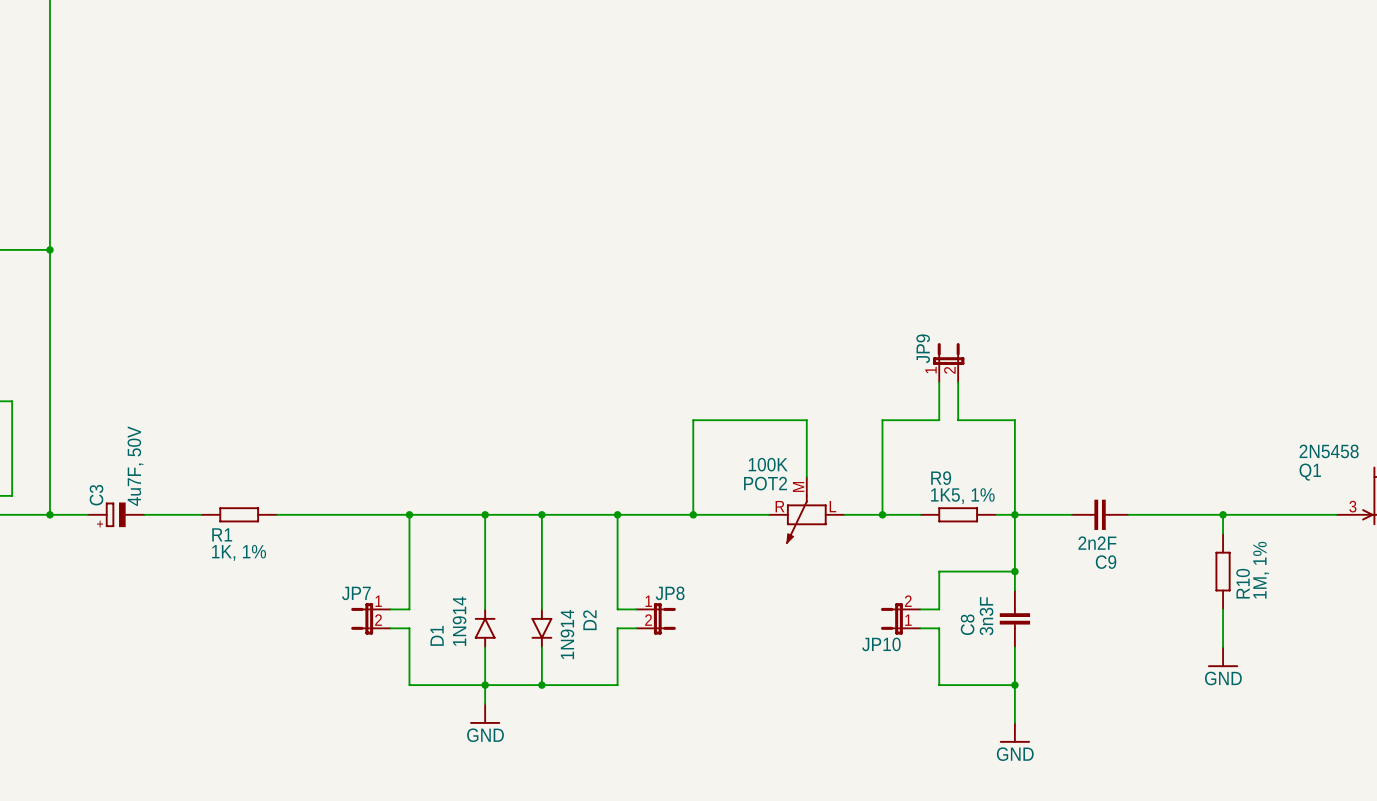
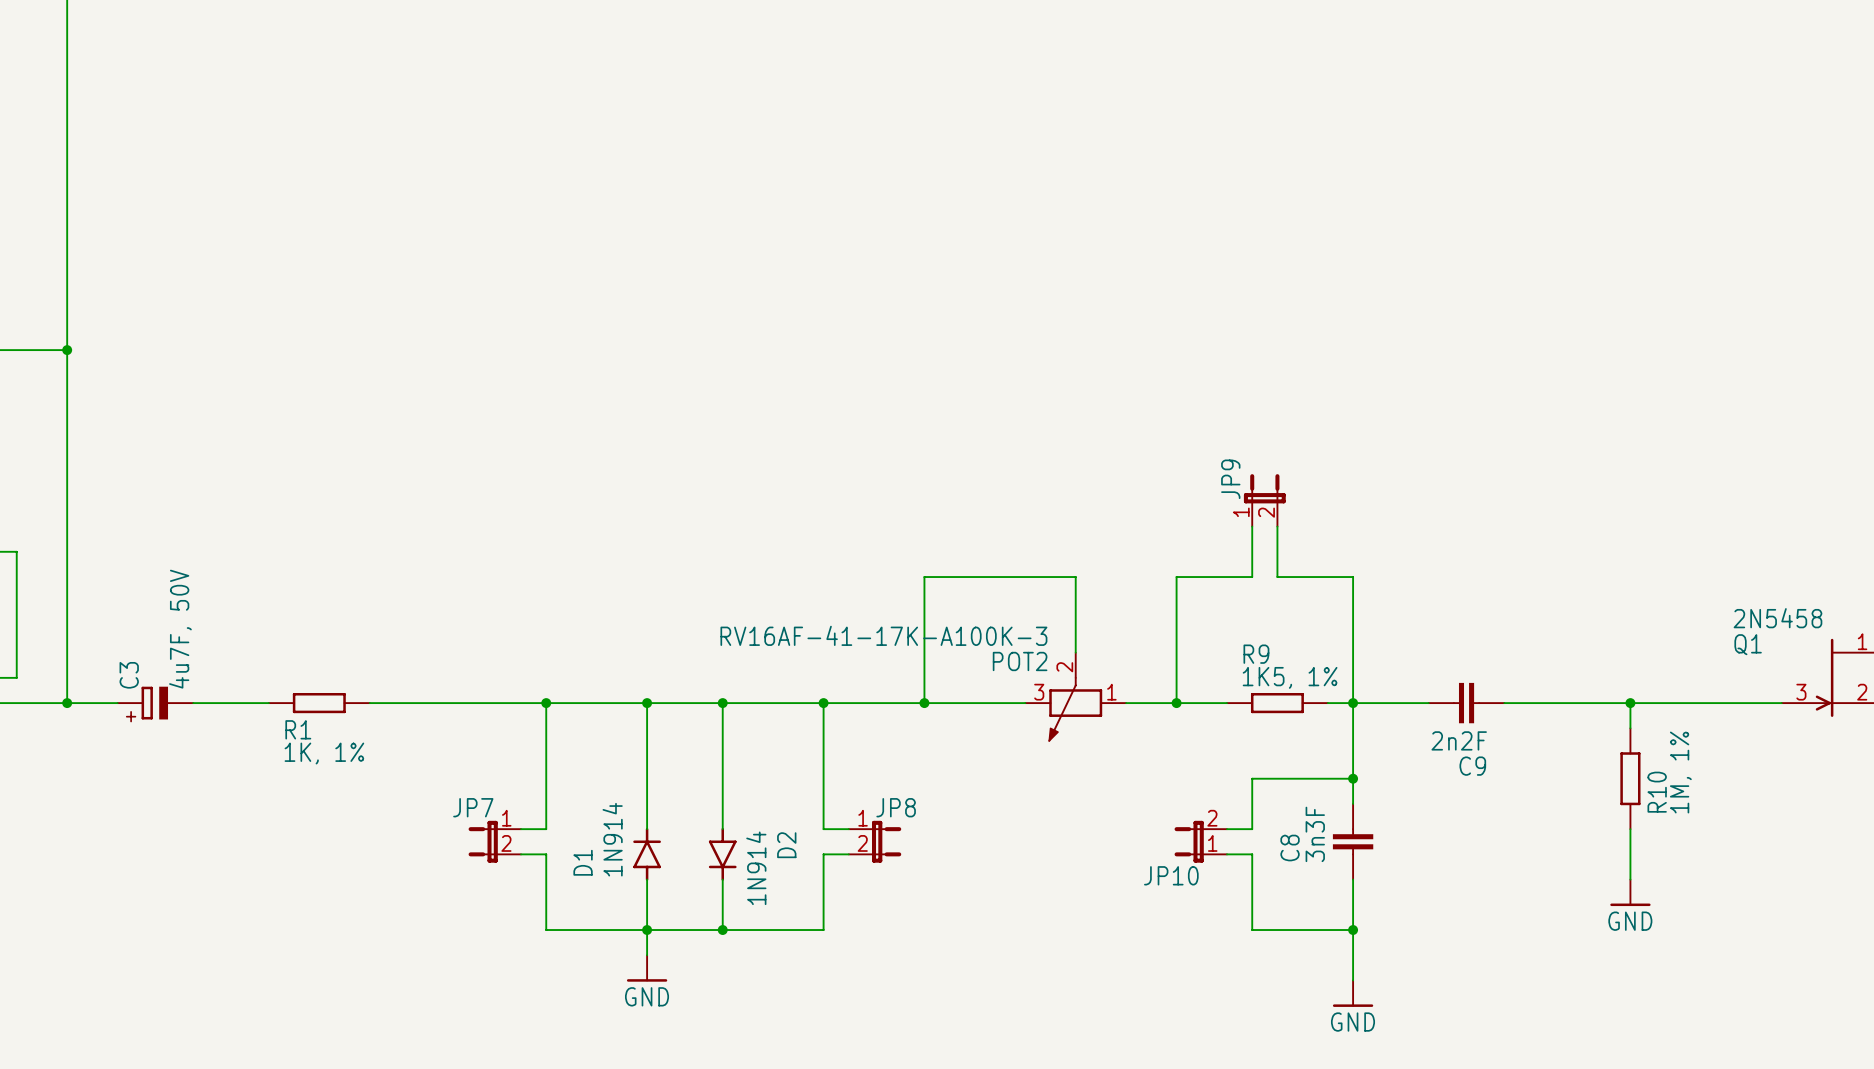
POT2 value: 100K (768, 464) -> RV16AF-41-17K-A100K-3 (883, 635)
POT2 pin number: M (798, 486) -> 2 (1064, 667)
POT2 pin number: R (780, 506) -> 3 (1039, 692)
POT2 pin number: L (832, 506) -> 1 (1111, 692)

